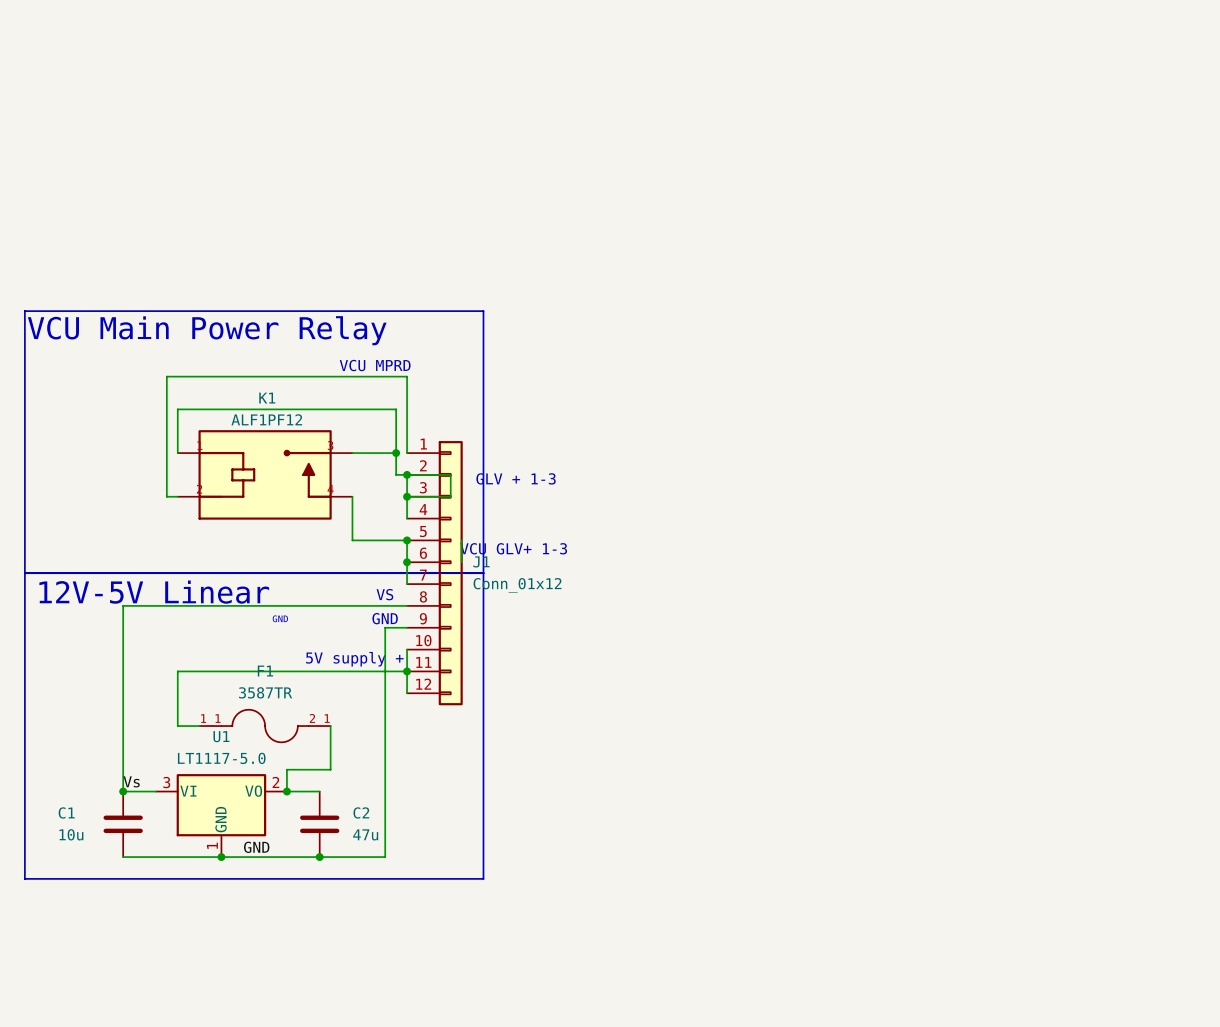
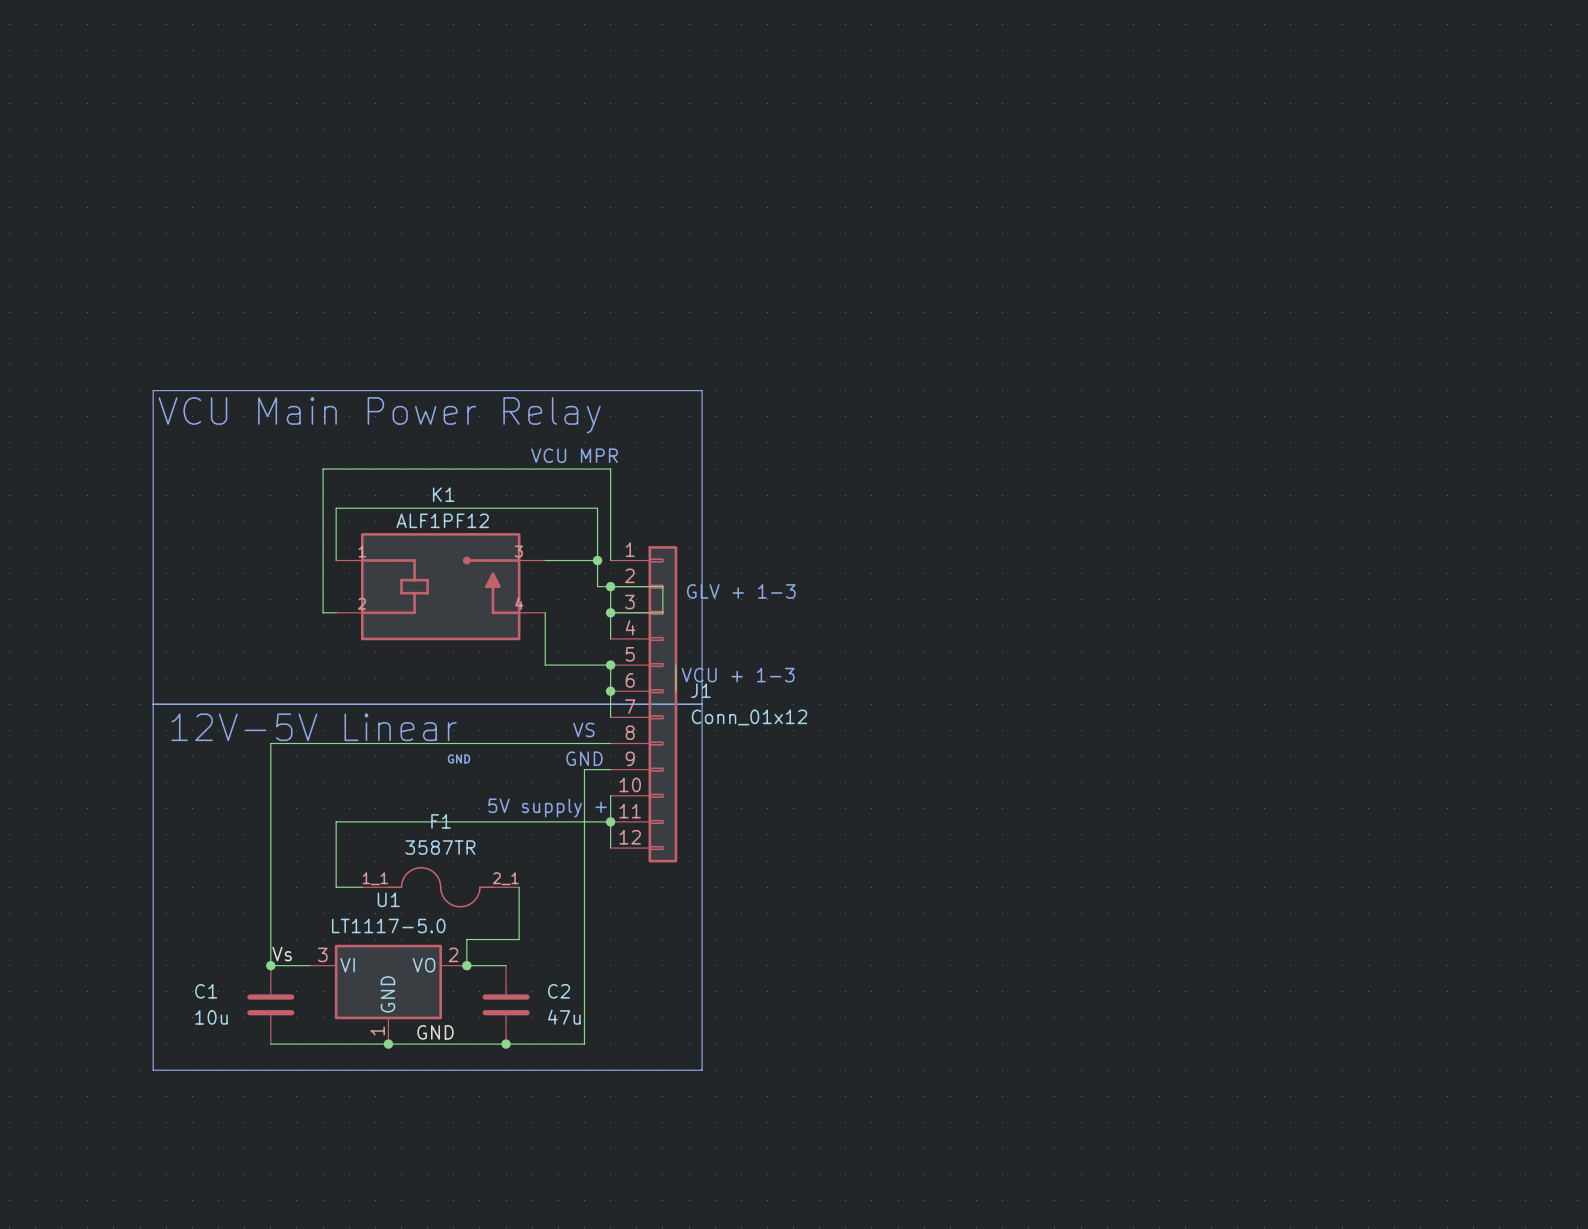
text: VCU MPRD (375, 365) -> VCU MPR (574, 455)
text: VCU GLV+ 1-3 (513, 548) -> VCU + 1-3 (738, 675)

